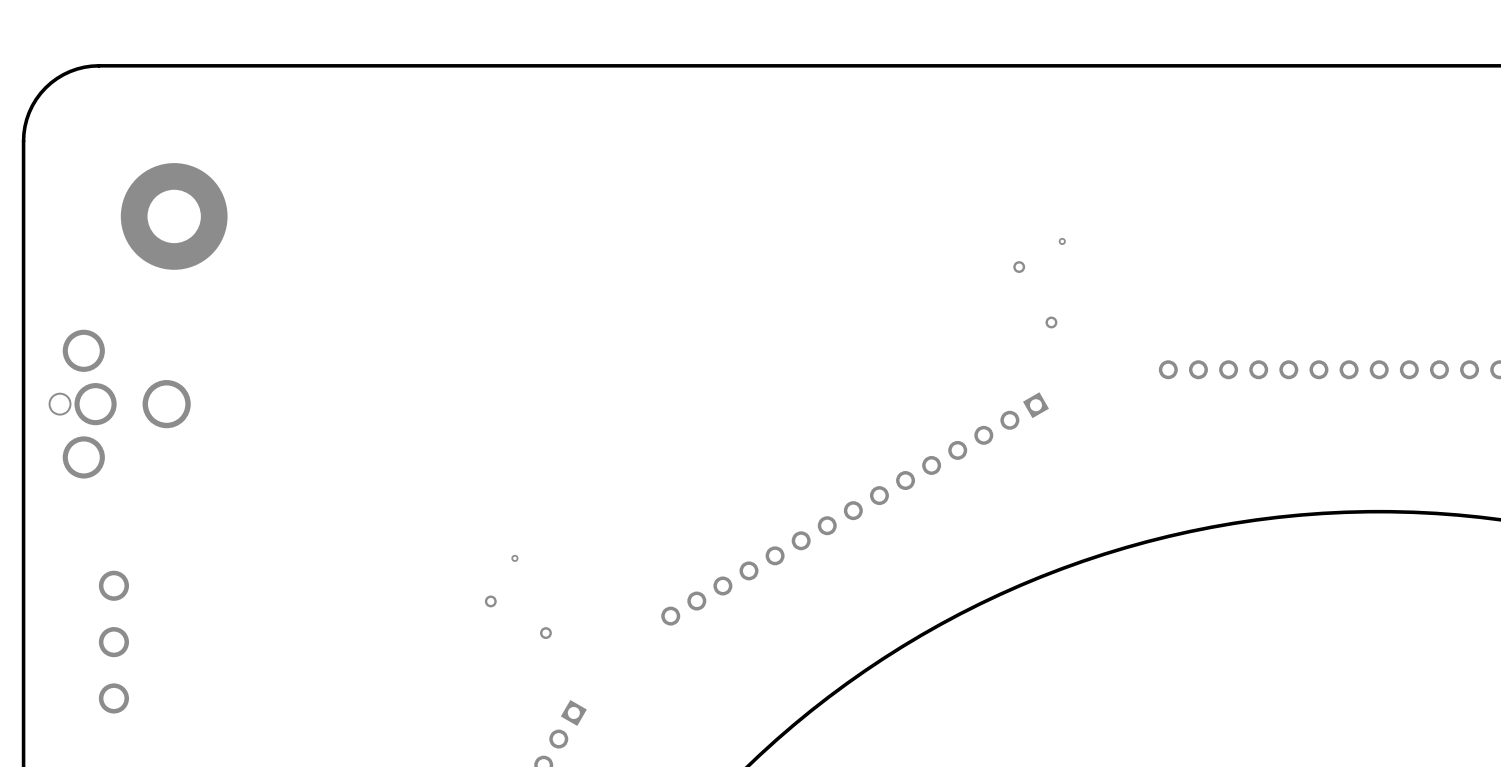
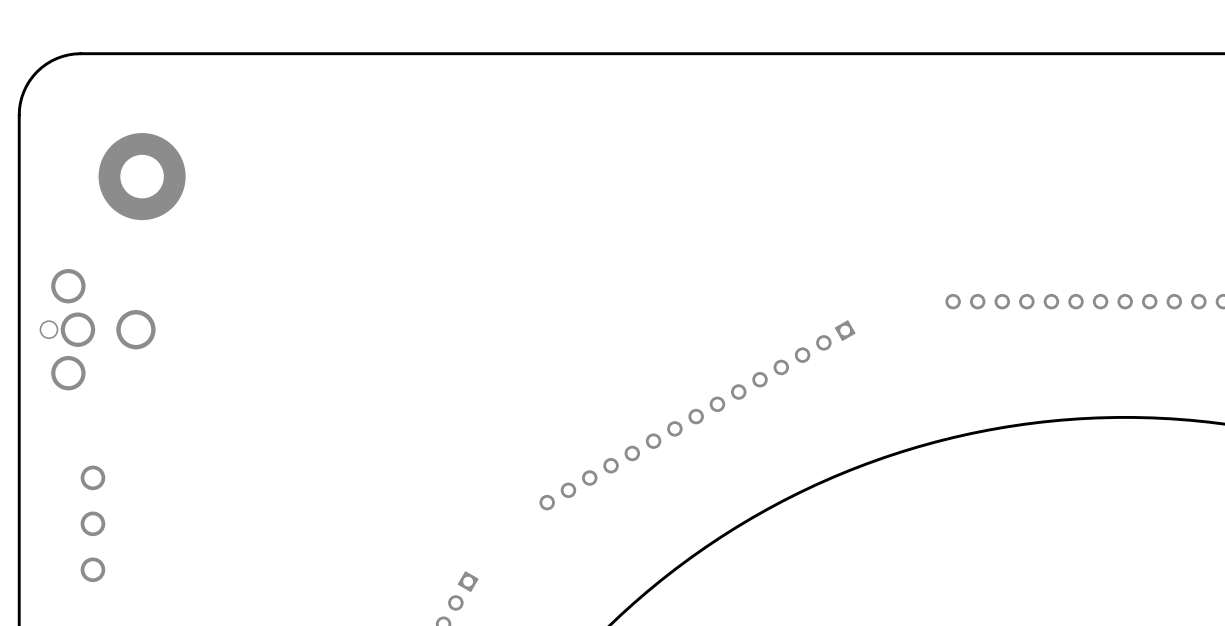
via: (1062, 241) -> none
via: (1019, 267) -> none
via: (1051, 322) -> none
via: (514, 558) -> none
via: (490, 601) -> none
via: (545, 633) -> none

